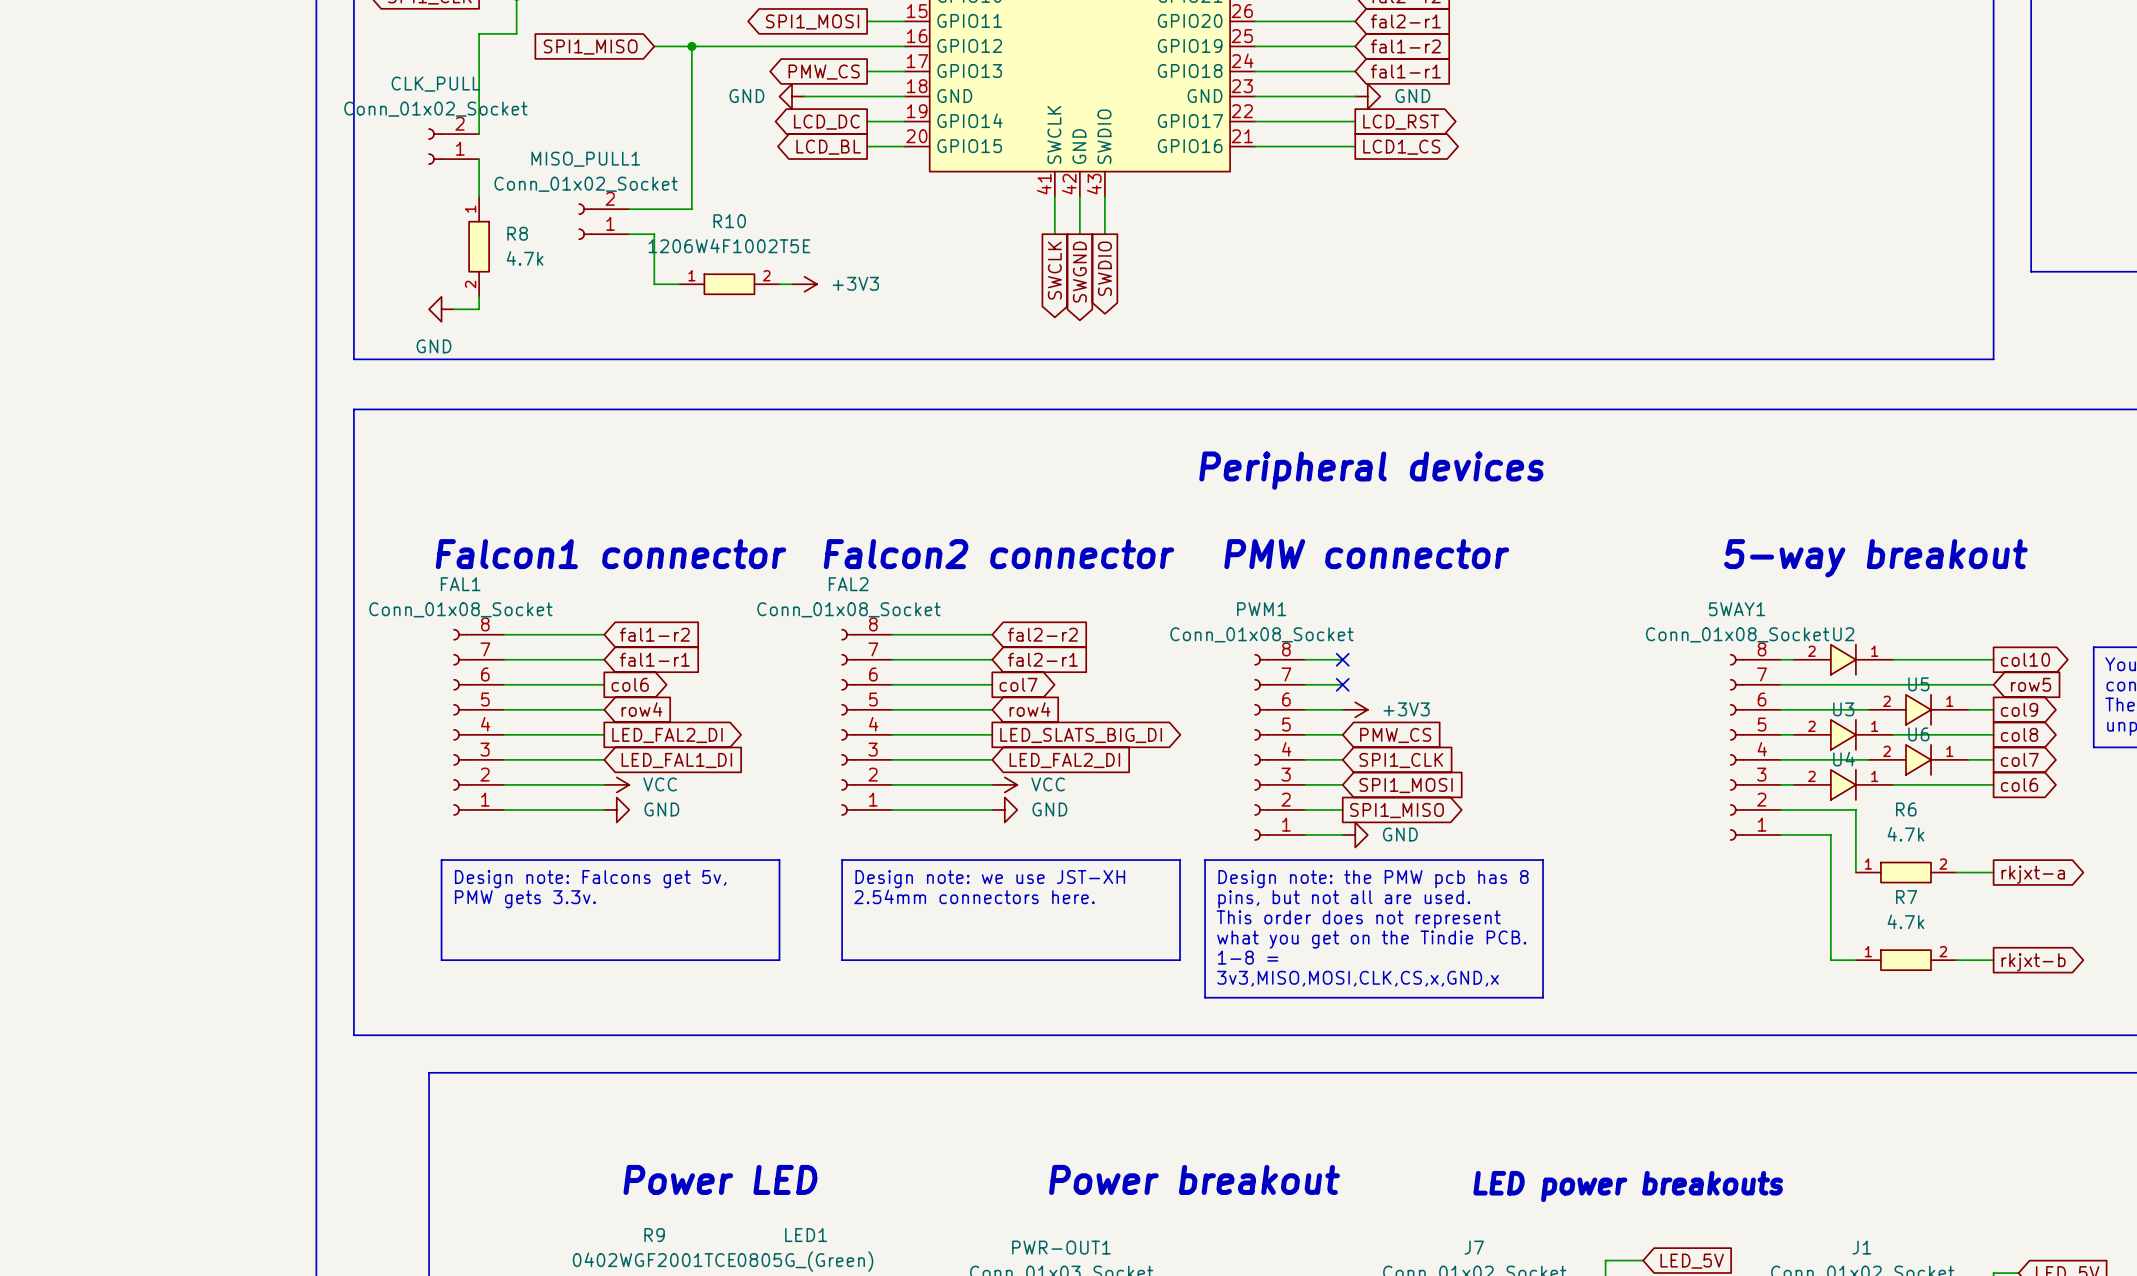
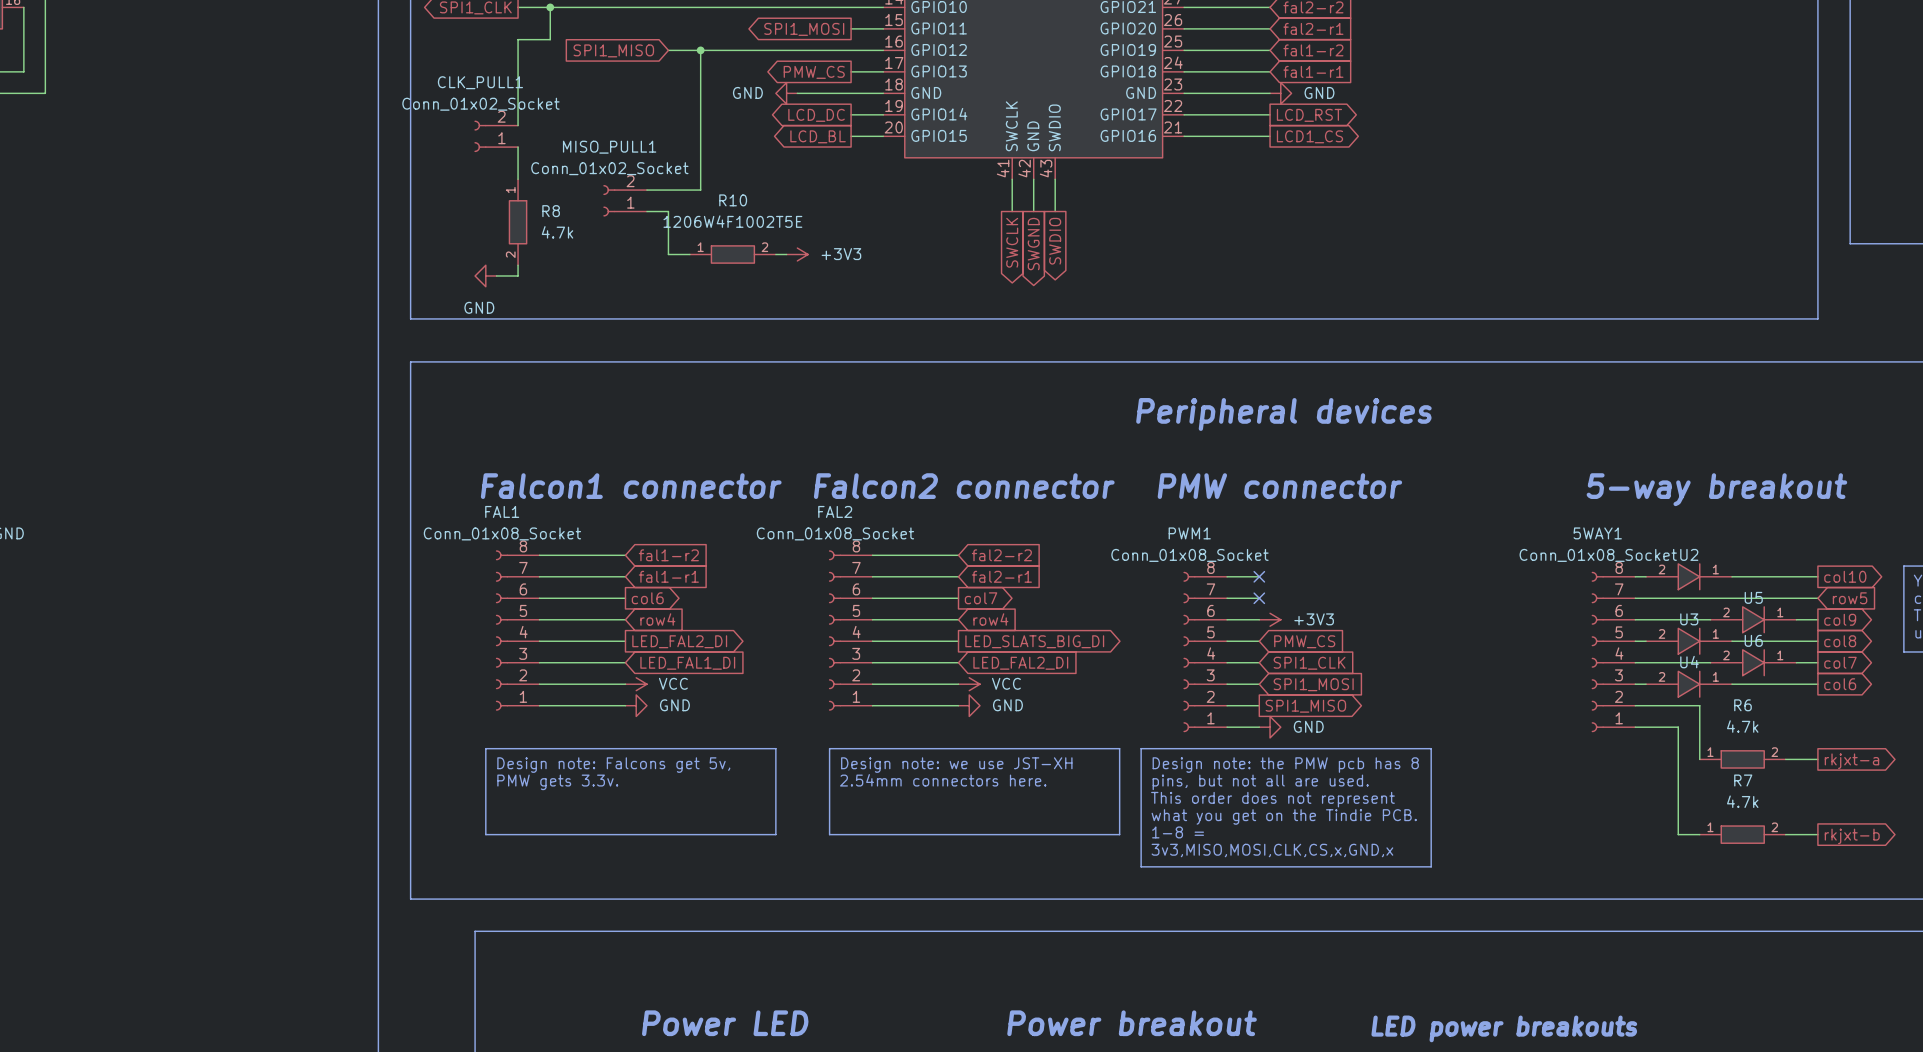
CLK_PULL name: CLK_PULL (435, 84) -> CLK_PULL1 (480, 82)

